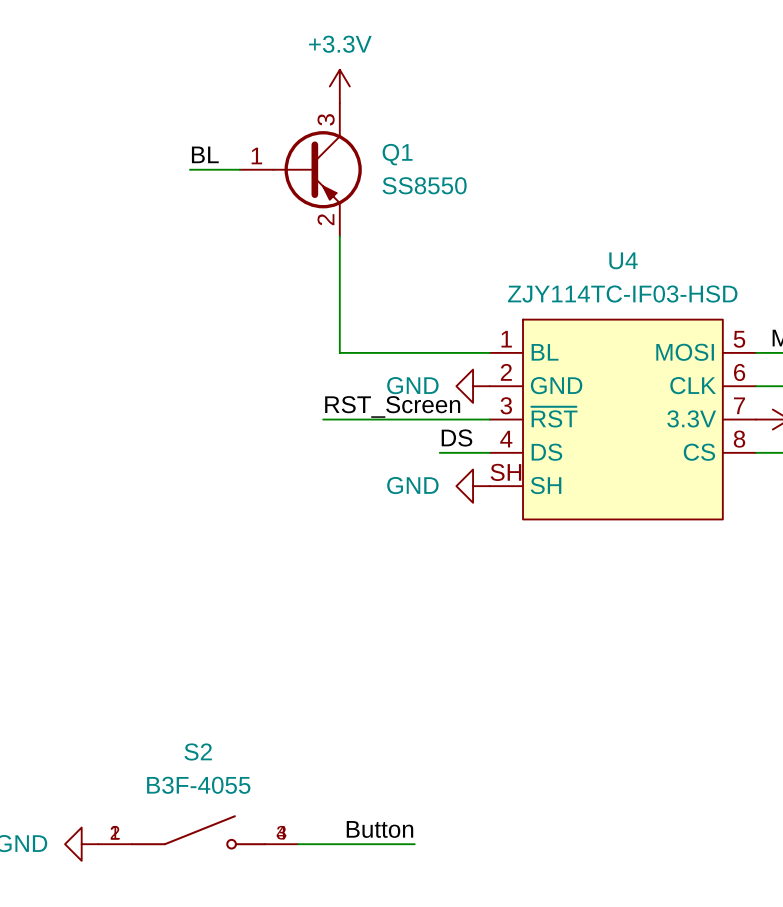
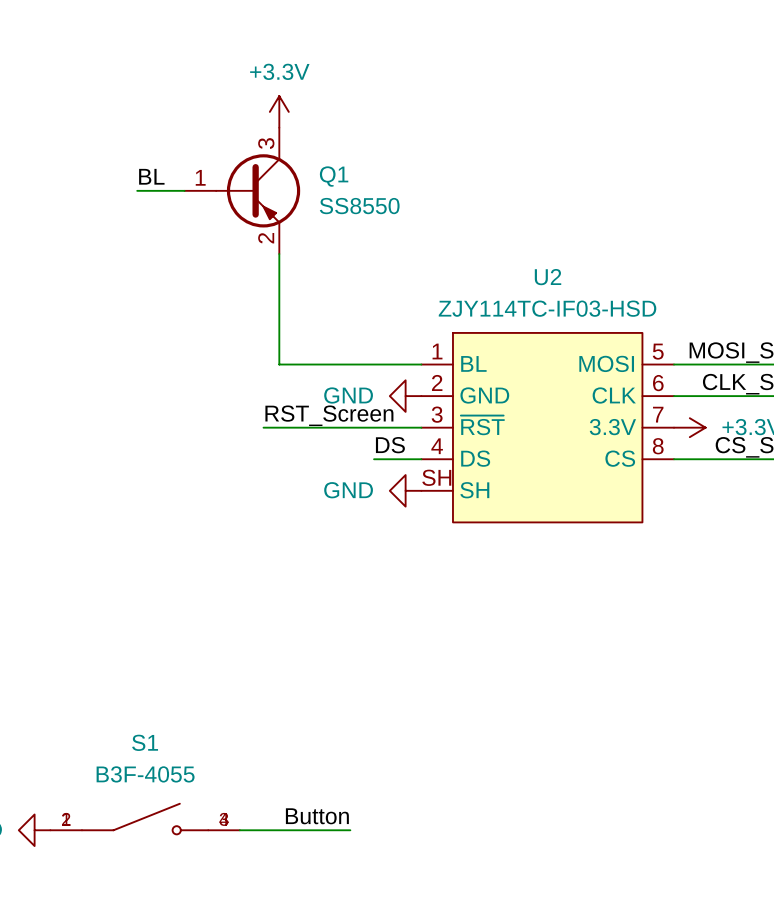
U4 name: U4 (623, 260) -> U2 (548, 277)
S2 name: S2 (198, 751) -> S1 (145, 742)

